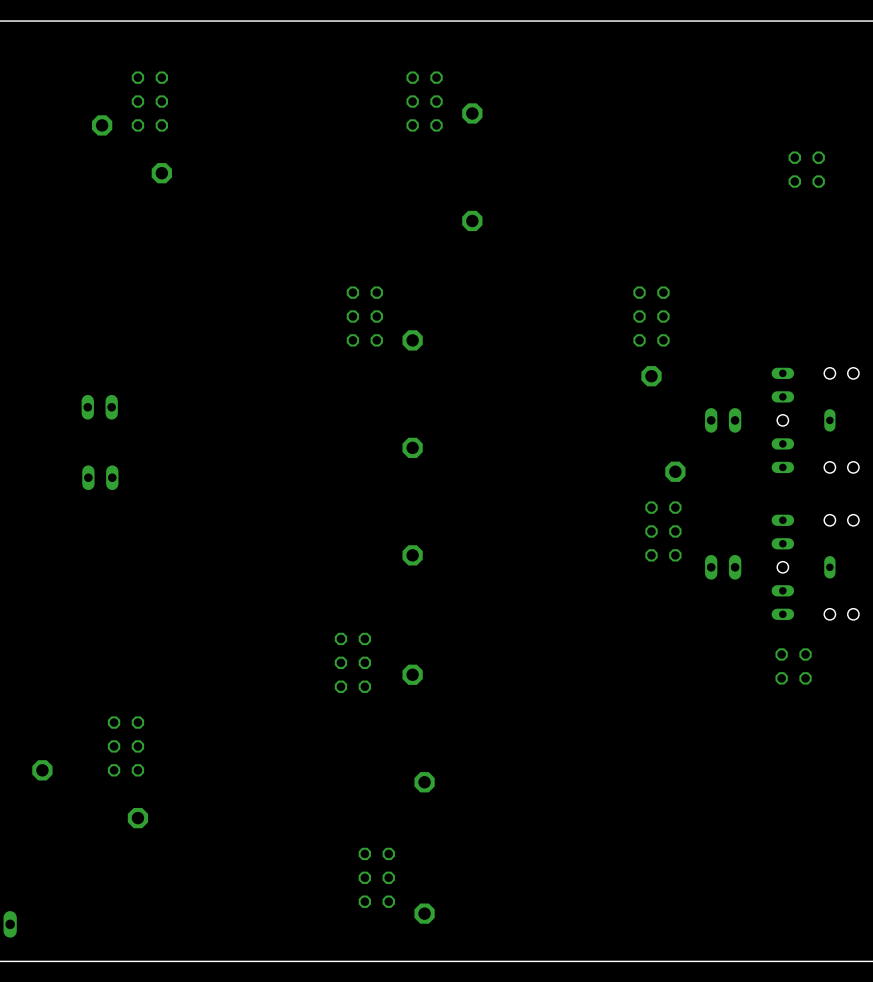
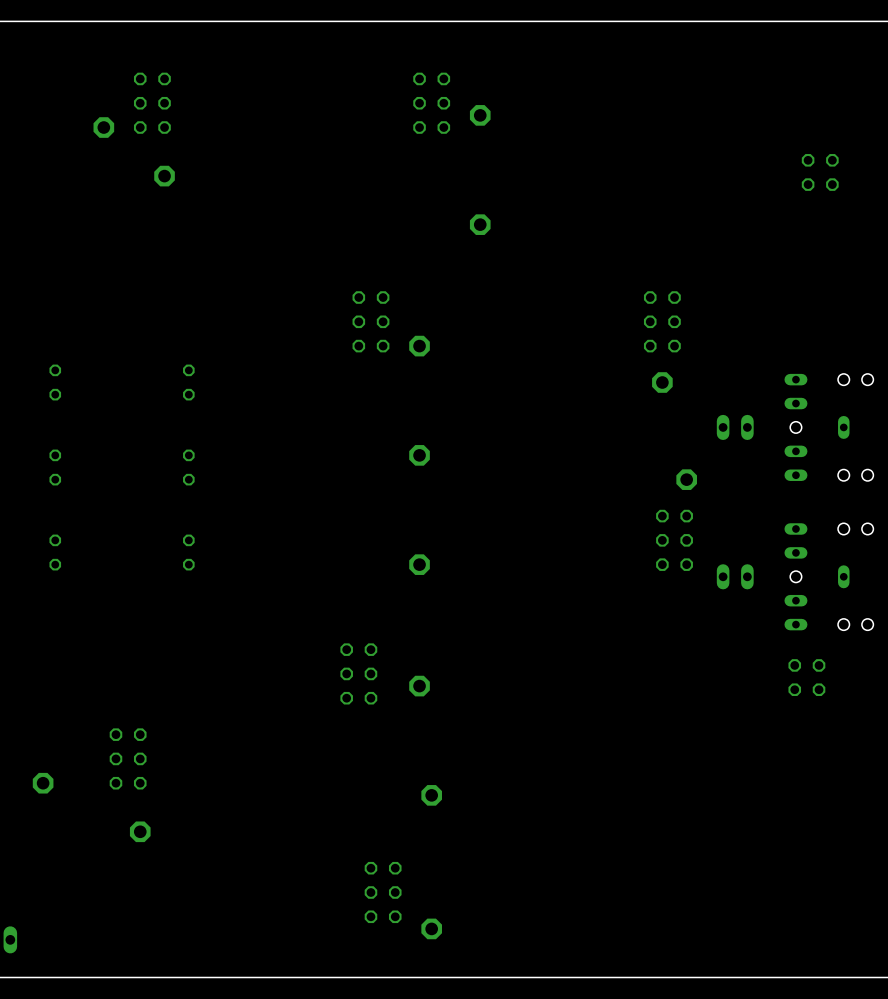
part: none -> (55, 382)
part: none -> (188, 382)
part: (99, 407) -> none
part: none -> (55, 467)
part: none -> (188, 467)
part: (100, 477) -> none
part: none -> (55, 552)
part: none -> (188, 552)

